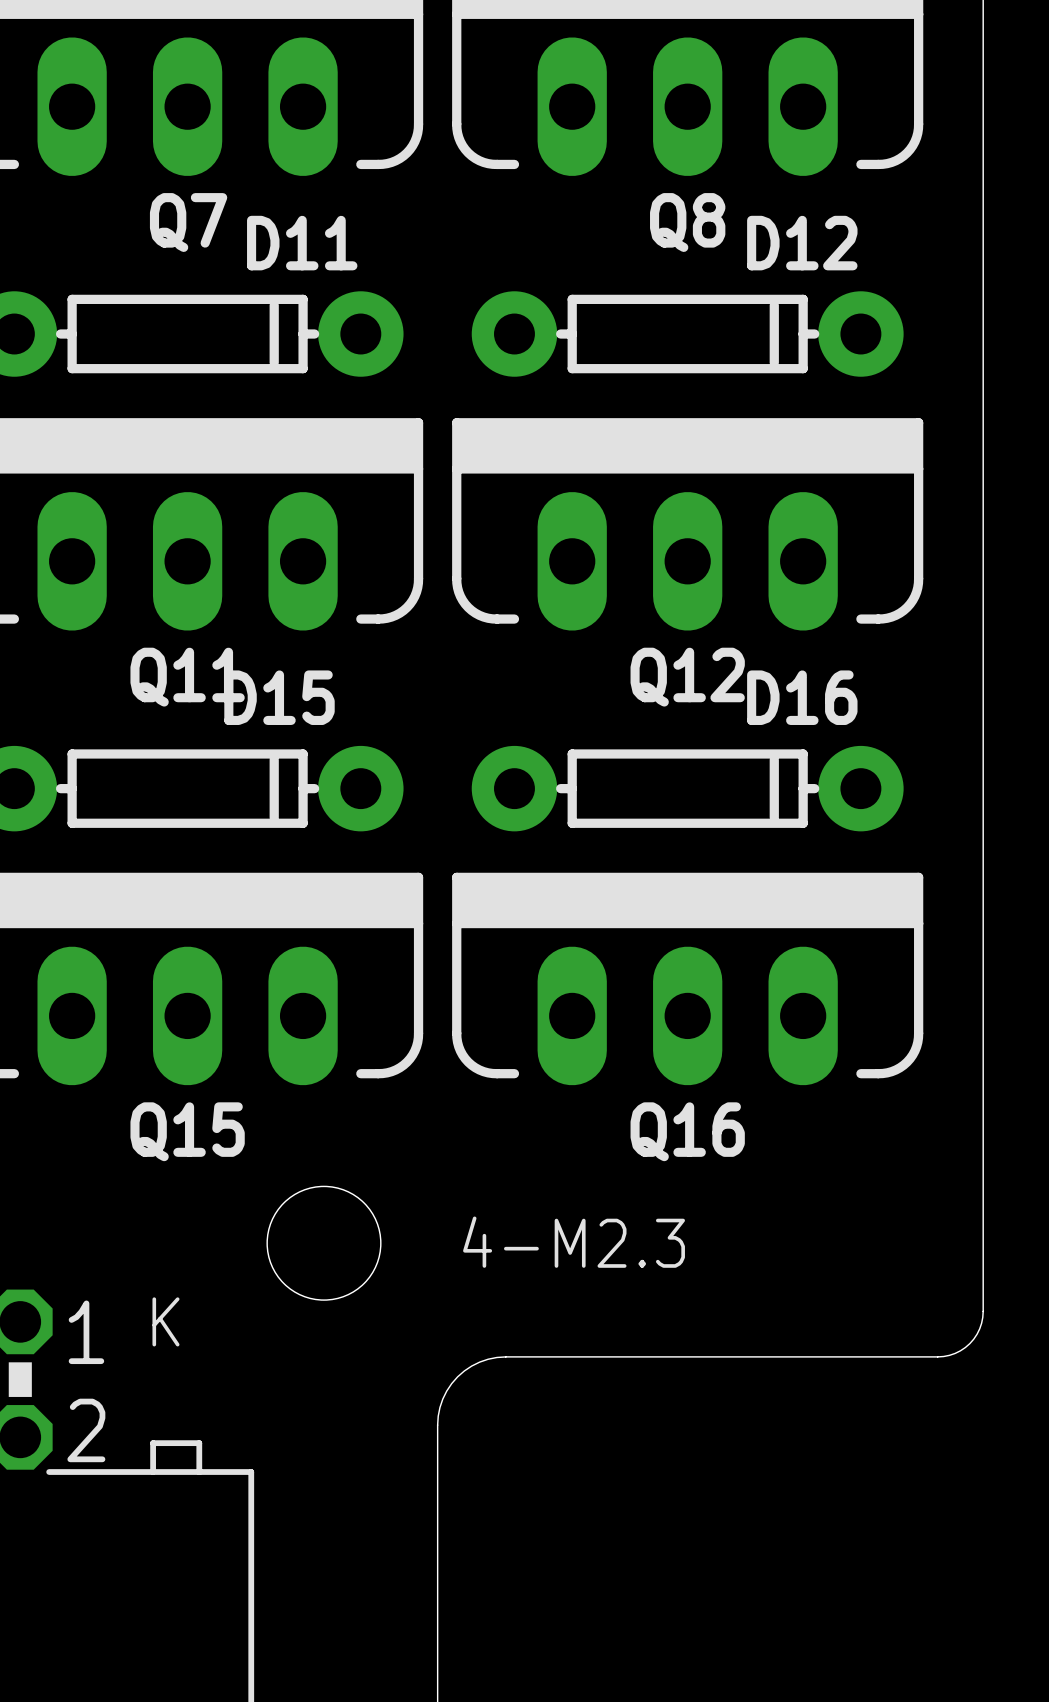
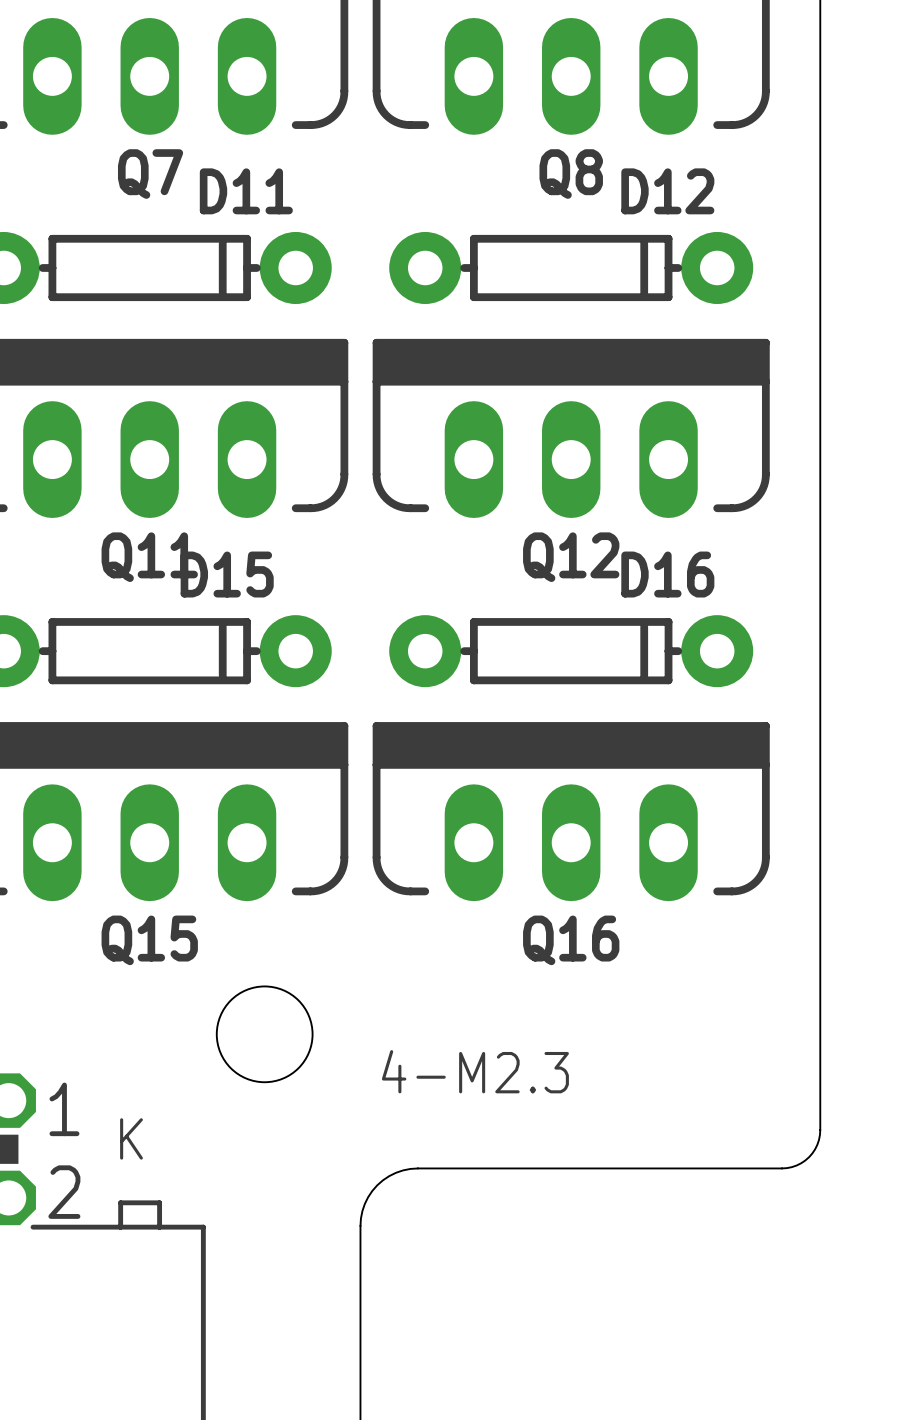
text position: 4-M2.3 (574, 1242) -> 4-M2.3 (475, 1071)
board edge: (983, 1311) (979, 1328) (973, 1339) (960, 1350) (943, 1356) (505, 1356) (488, 1359) (471, 1366) (457, 1376) (442, 1399) (438, 1416) (437, 1470) -> (820, 1091) (820, 1130) (817, 1144) (805, 1160) (791, 1167) (410, 1168) (395, 1172) (377, 1185) (364, 1203) (360, 1225)
text position: K (165, 1321) -> K (131, 1138)

